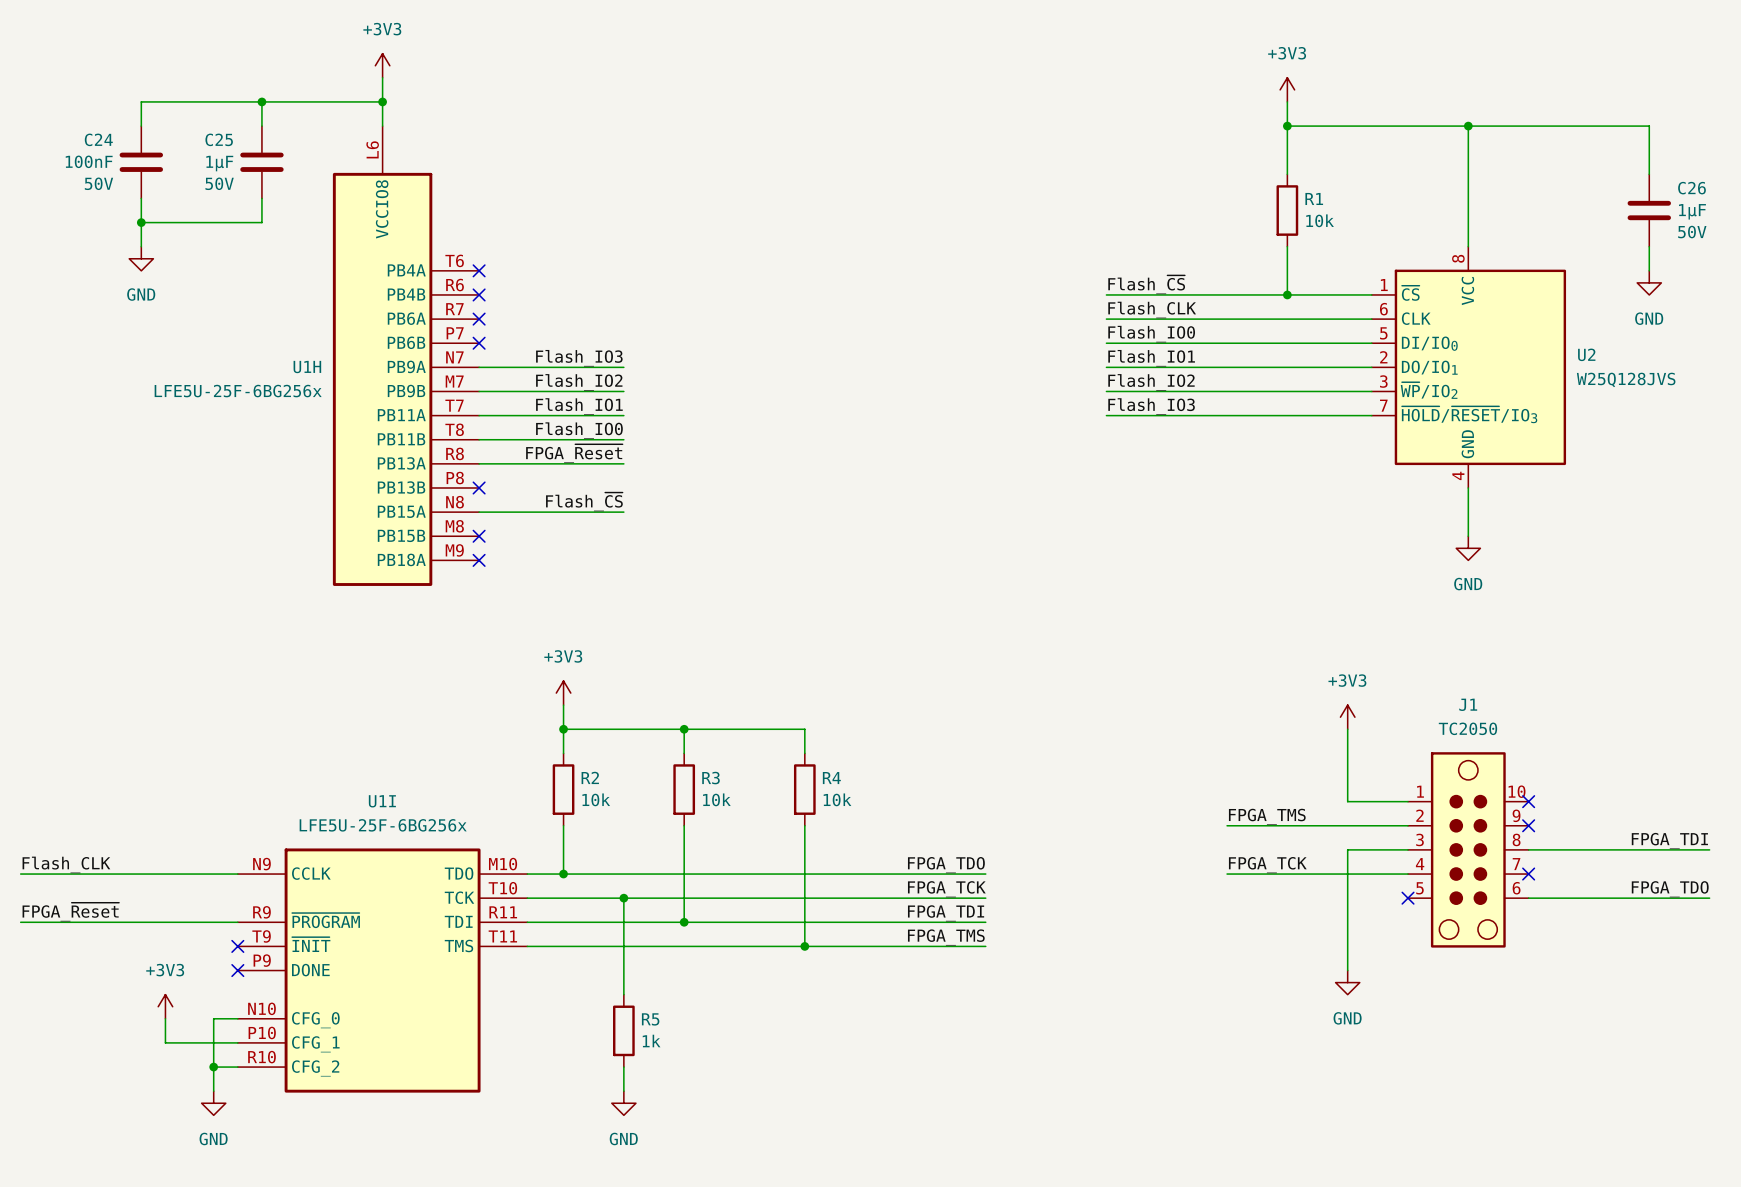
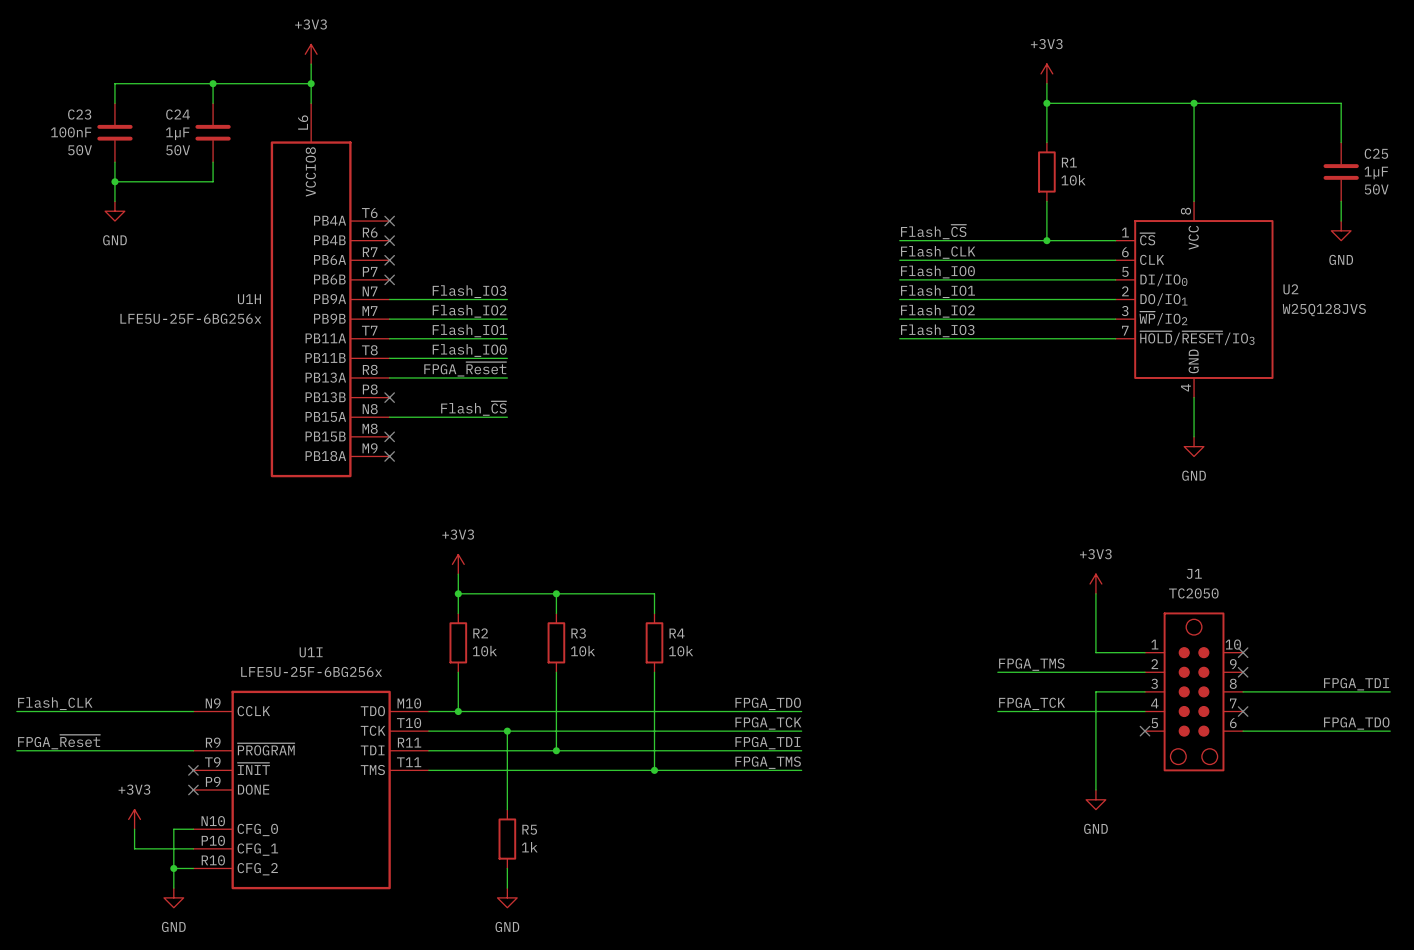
C24 name: C24 (98, 139) -> C23 (79, 114)
C25 name: C25 (219, 139) -> C24 (178, 114)
C26 name: C26 (1691, 188) -> C25 (1376, 153)

